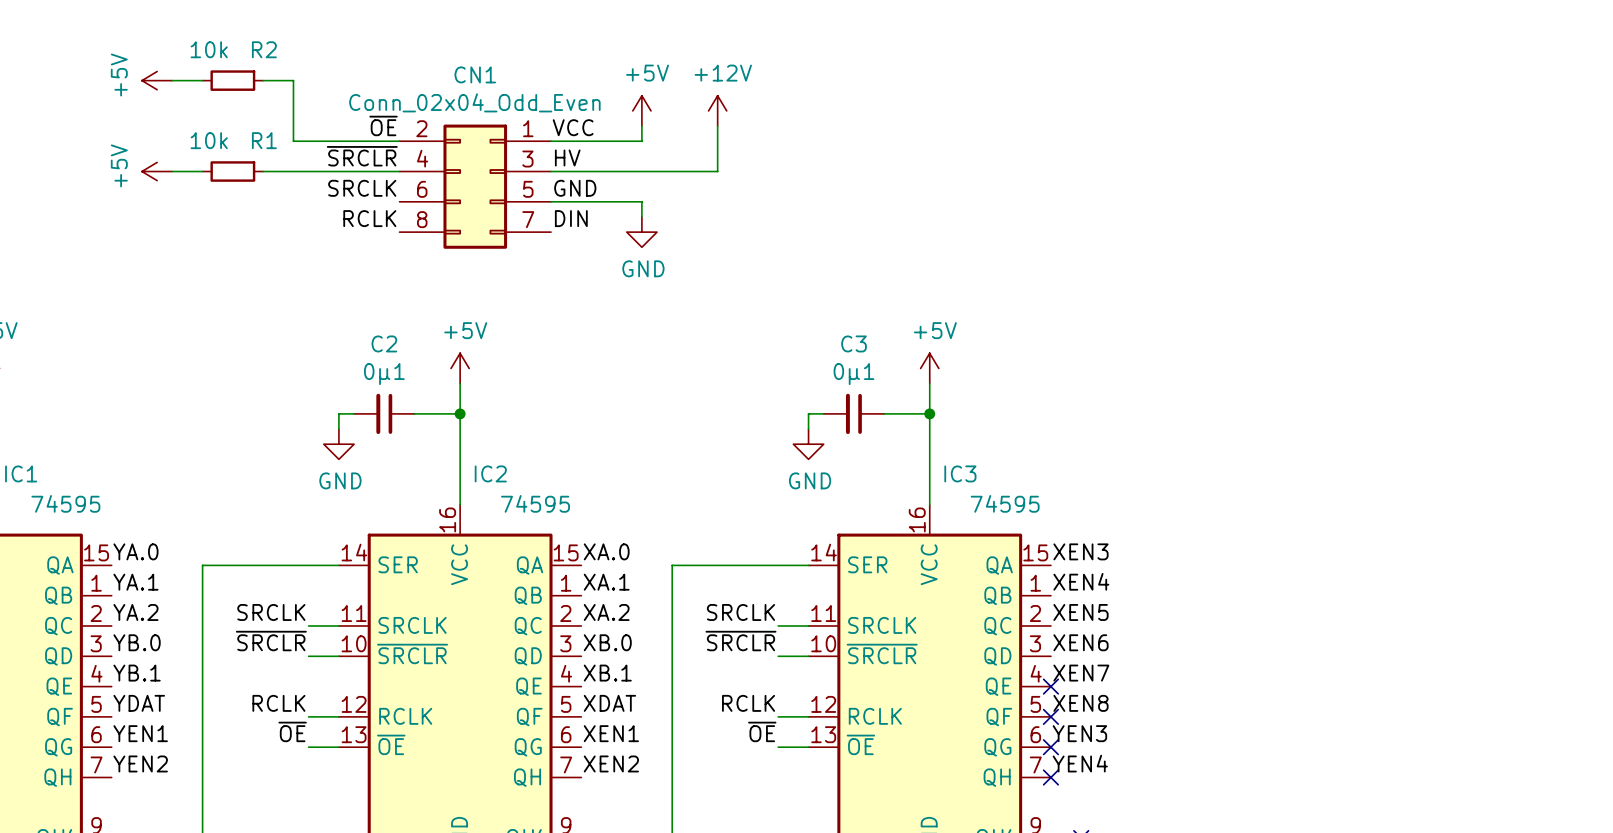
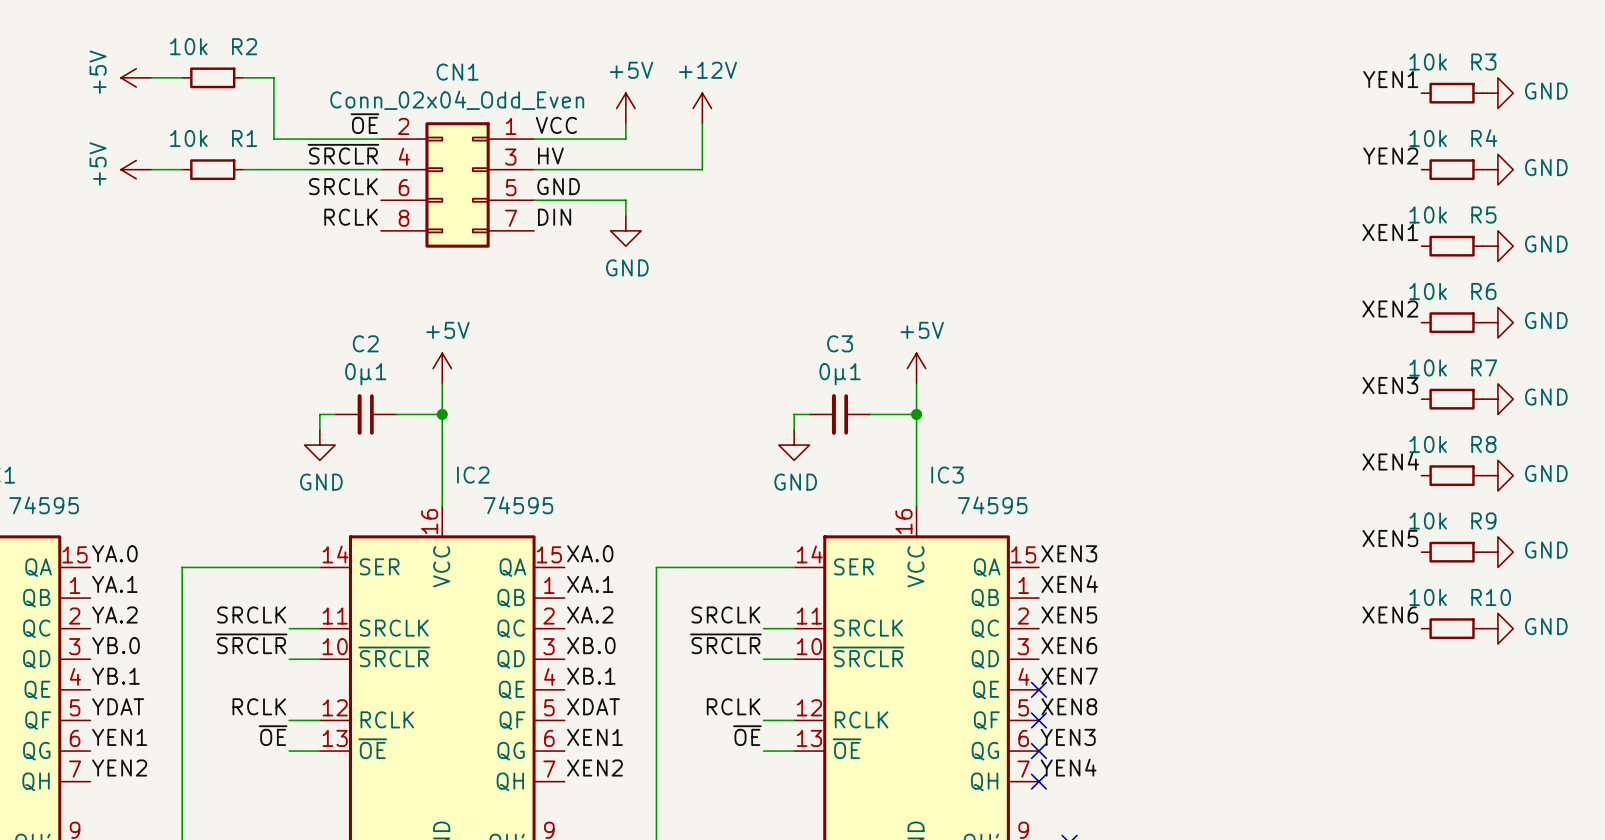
label: none -> YEN1 (1390, 79)
R3: none -> 10k (1452, 93)
power symbol: none -> GND (1497, 93)
label: none -> YEN2 (1390, 156)
R4: none -> 10k (1452, 169)
power symbol: none -> GND (1497, 169)
label: none -> XEN1 (1390, 232)
R5: none -> 10k (1452, 246)
power symbol: none -> GND (1497, 246)
label: none -> XEN2 (1390, 309)
R6: none -> 10k (1452, 322)
power symbol: none -> GND (1497, 322)
label: none -> XEN3 (1390, 385)
R7: none -> 10k (1452, 399)
power symbol: none -> GND (1497, 399)
label: none -> XEN4 (1390, 461)
R8: none -> 10k (1452, 475)
power symbol: none -> GND (1497, 475)
label: none -> XEN5 (1390, 538)
R9: none -> 10k (1452, 552)
power symbol: none -> GND (1497, 552)
label: none -> XEN6 (1390, 615)
R10: none -> 10k (1452, 628)
power symbol: none -> GND (1497, 628)

